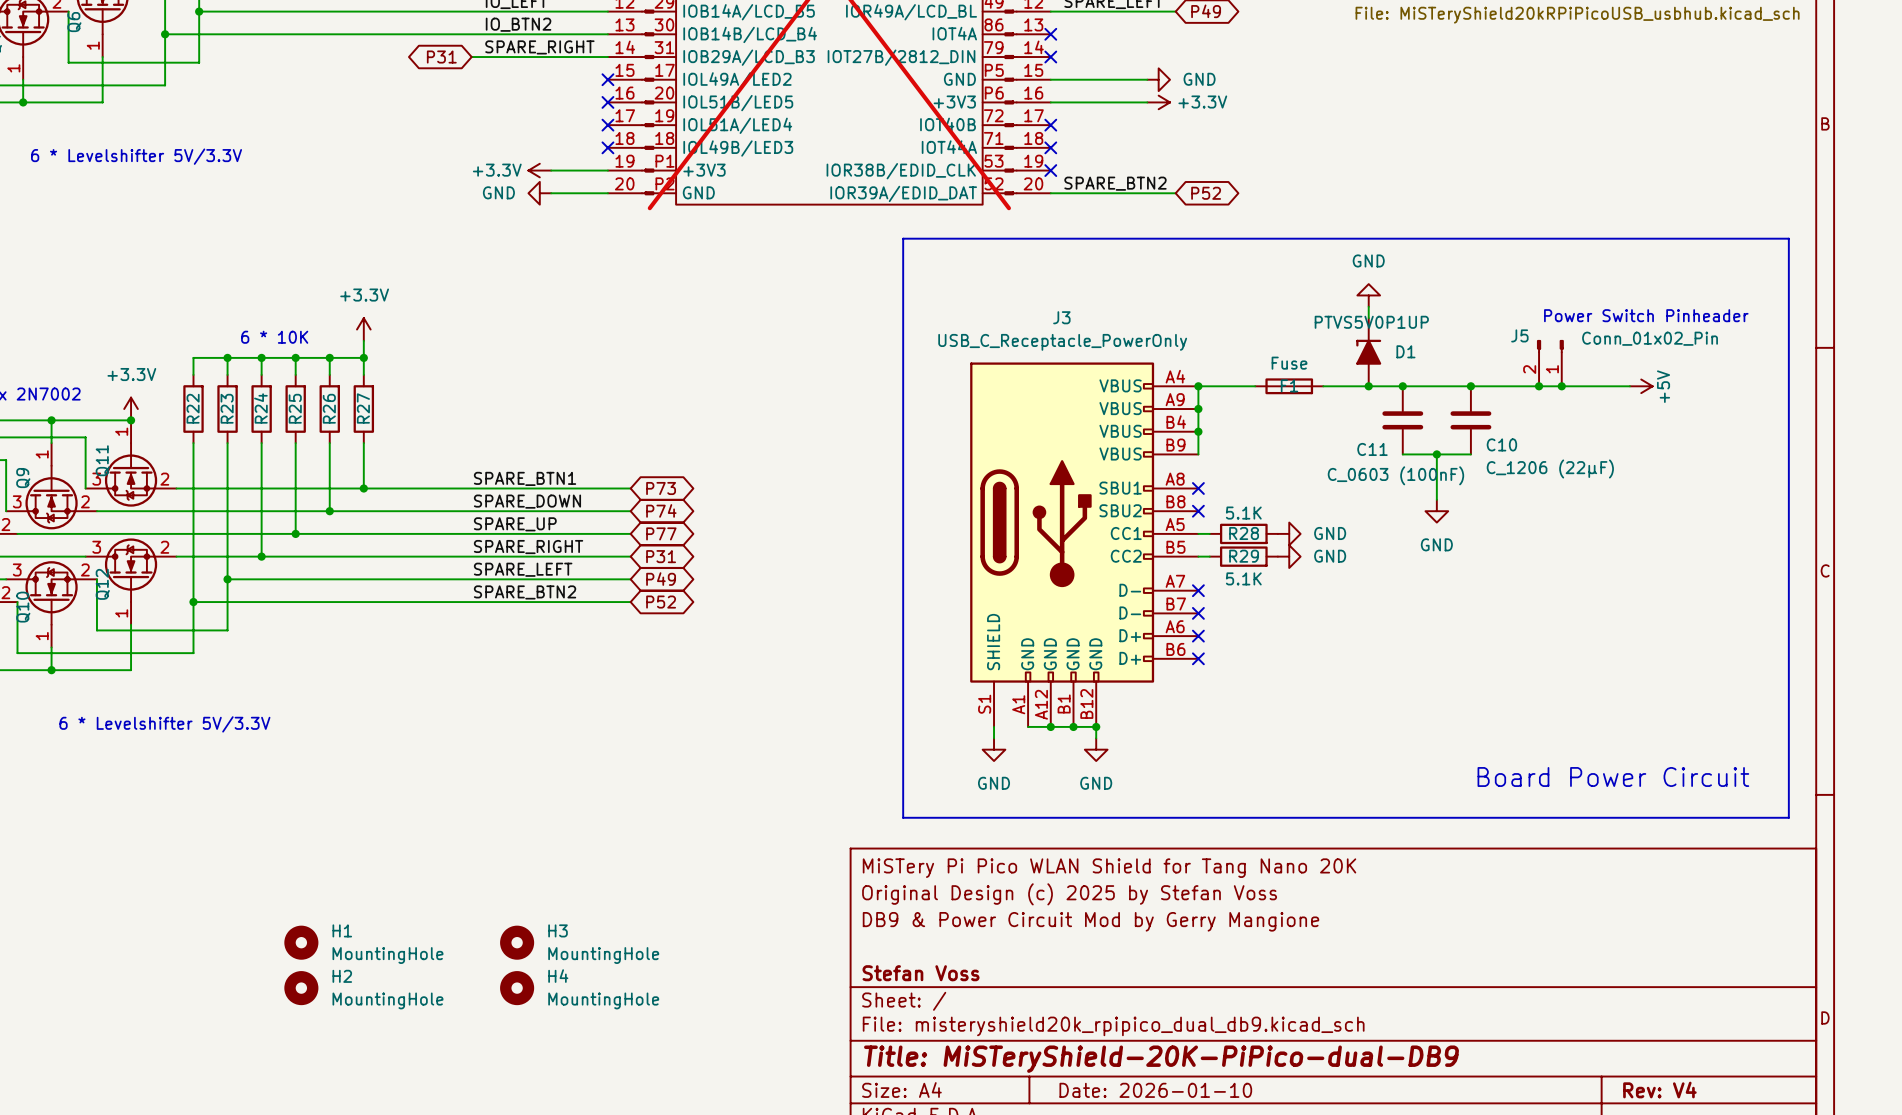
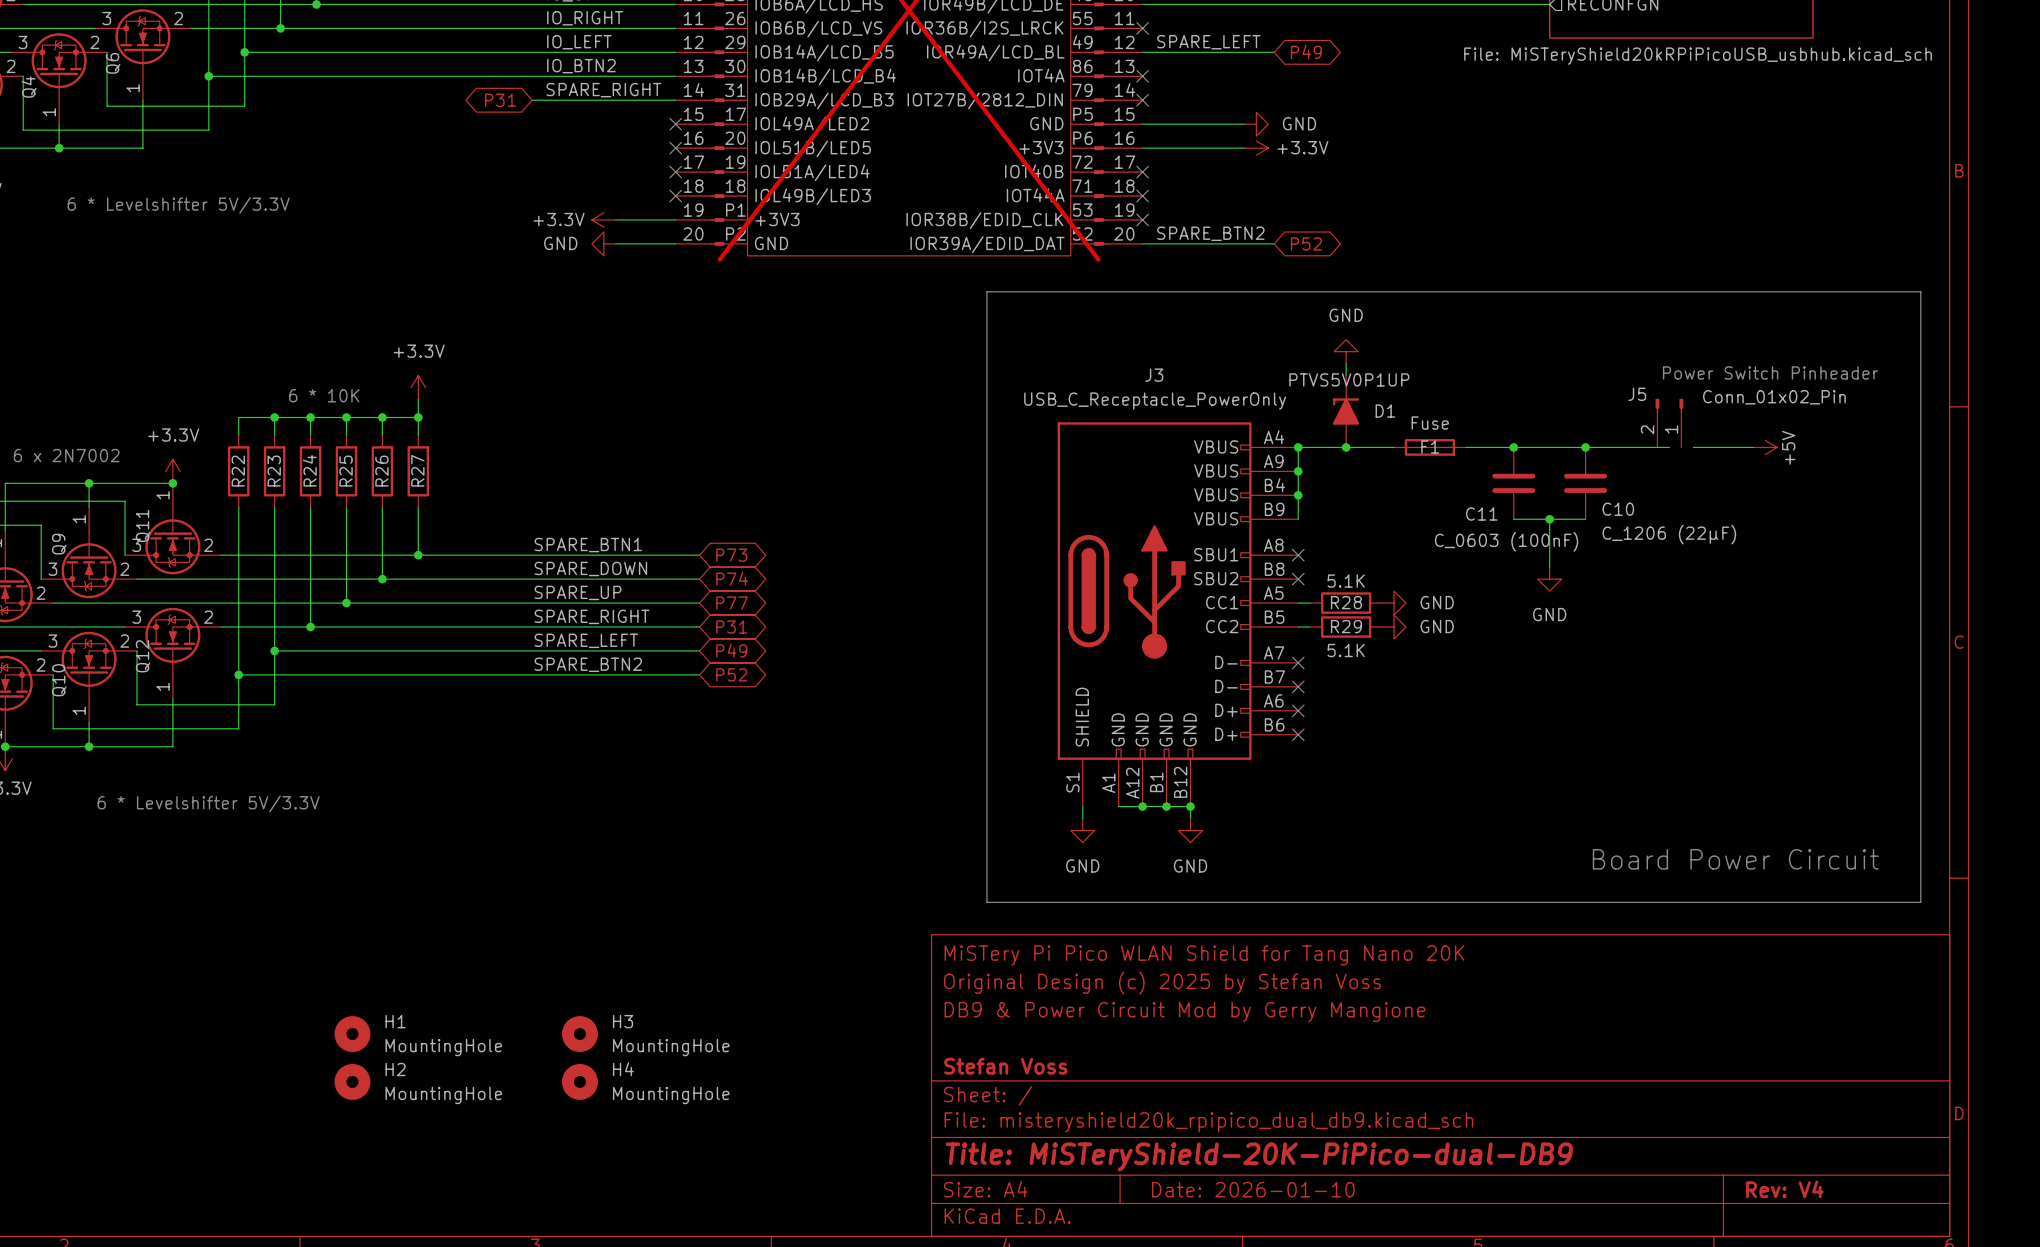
power symbol position: GND (1368, 295) -> GND (1346, 351)
wire: (1368, 306) (1368, 318) -> (1346, 363) (1346, 375)
D1 position: (1368, 352) -> (1346, 411)
junction: none -> (1346, 447)
F1 position: (1289, 386) -> (1429, 447)
junction: (1368, 386) -> none
junction: (1539, 386) -> none
wire: (1550, 386) (1573, 386) -> none
junction: (1561, 386) -> none

